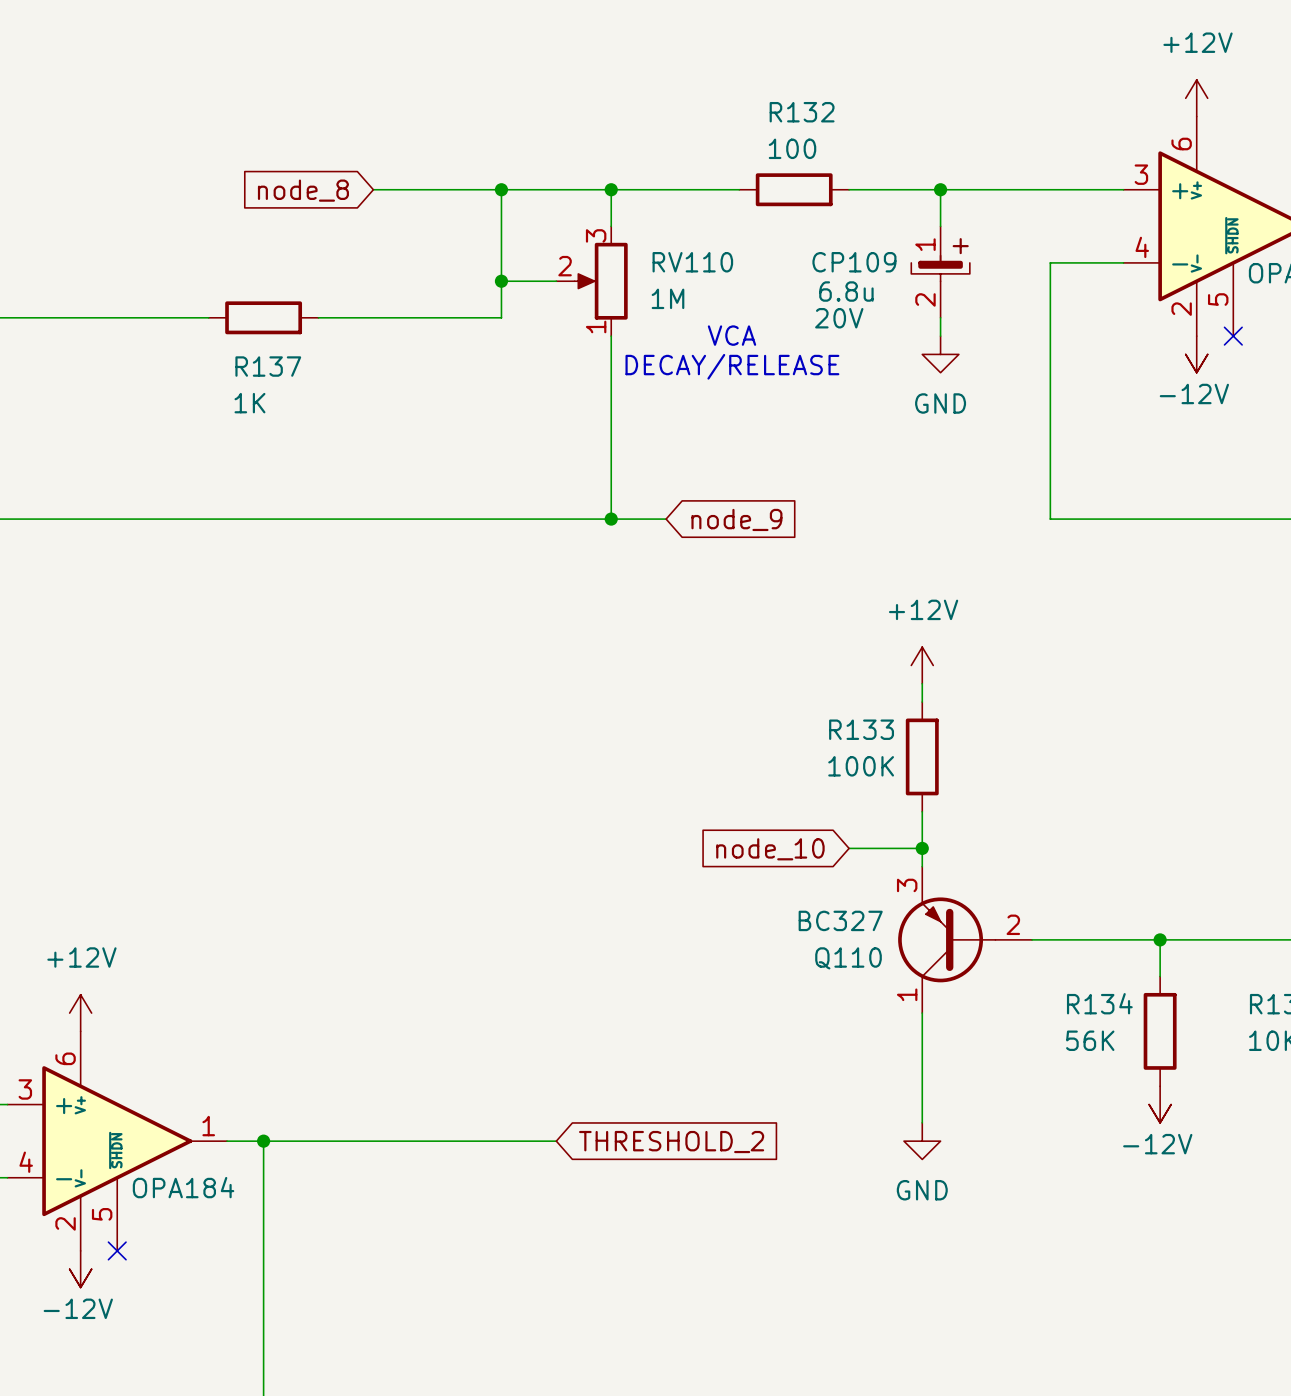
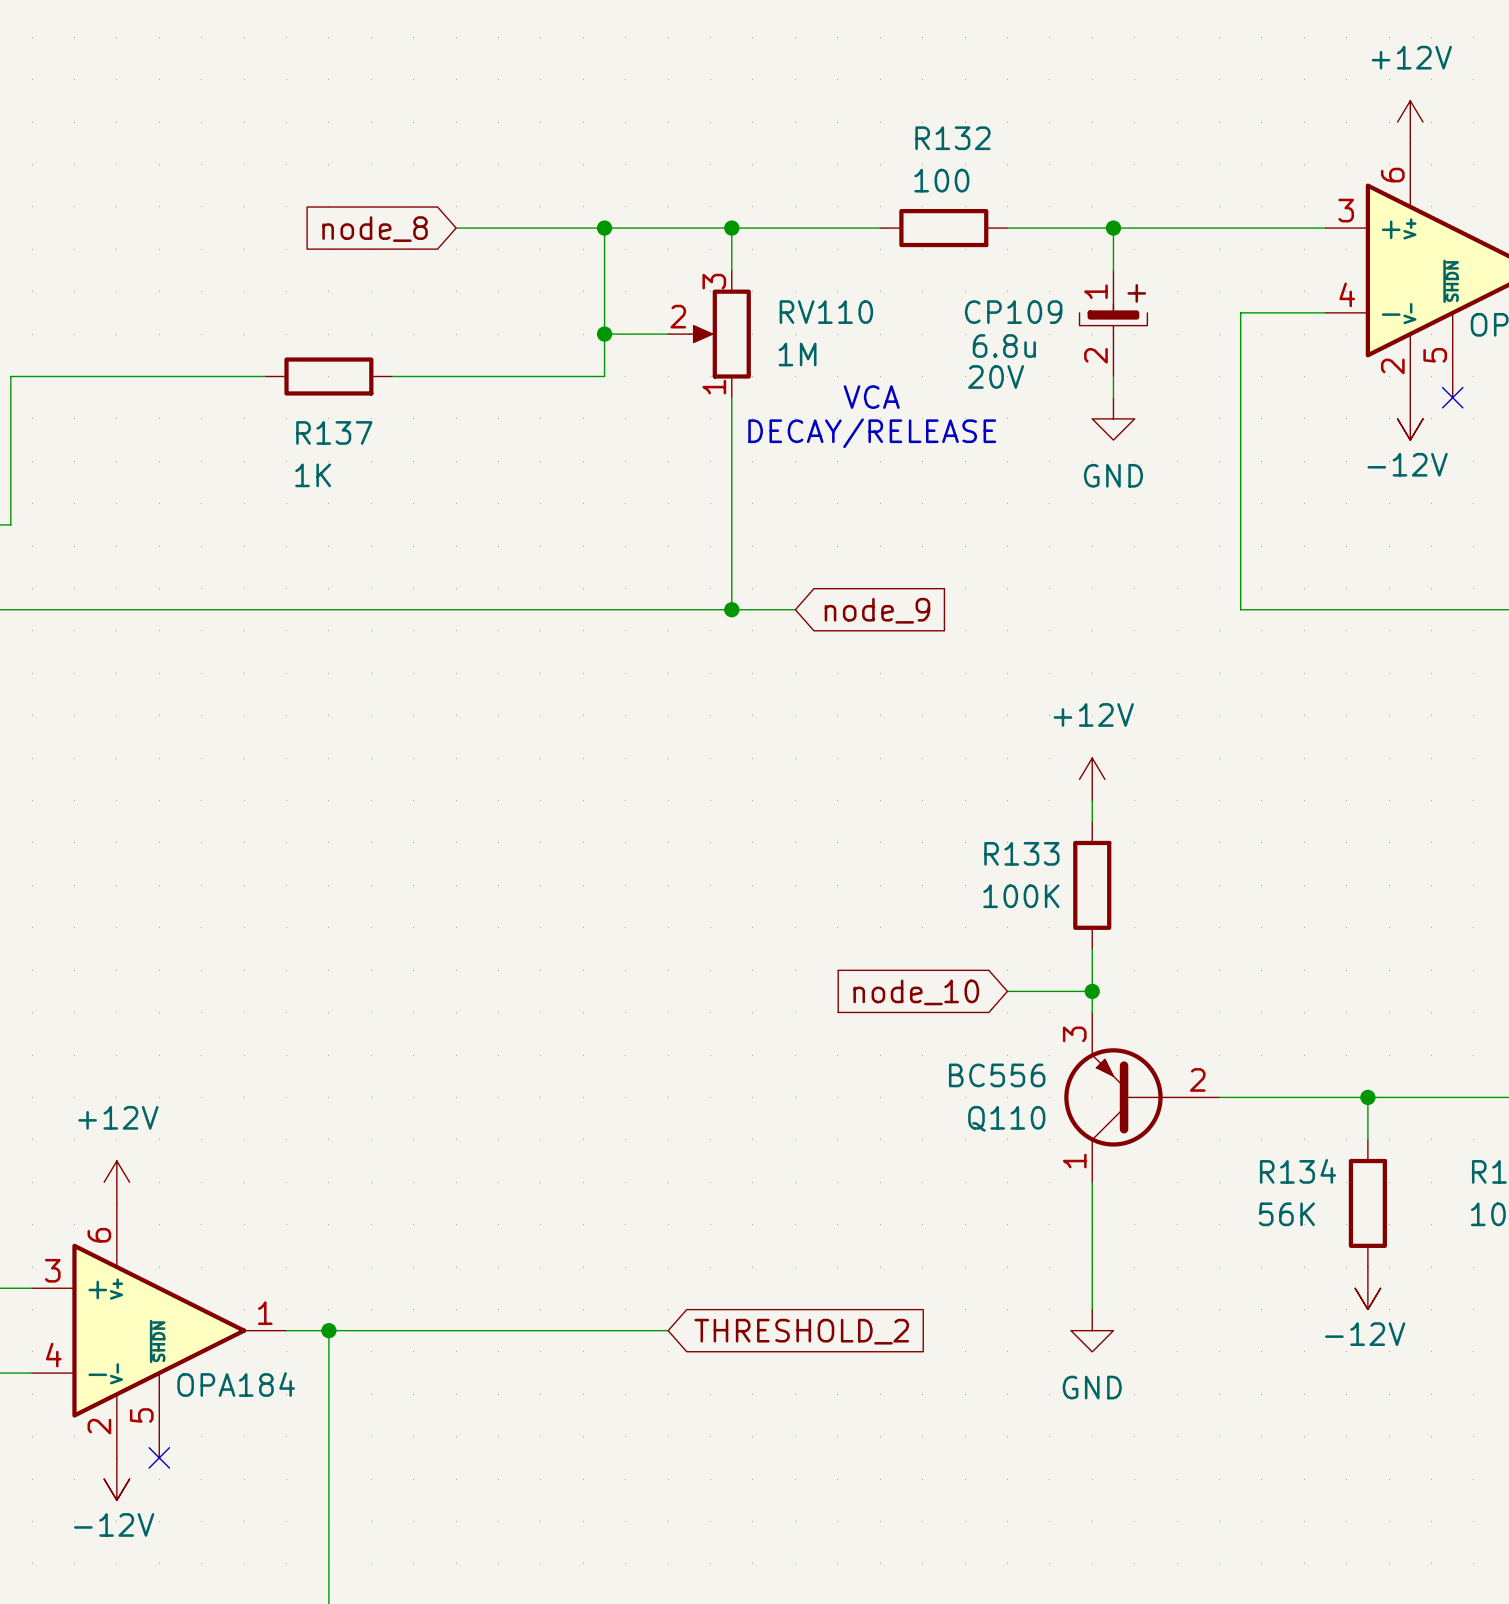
Q110 value: BC327 (840, 920) -> BC556 (997, 1075)

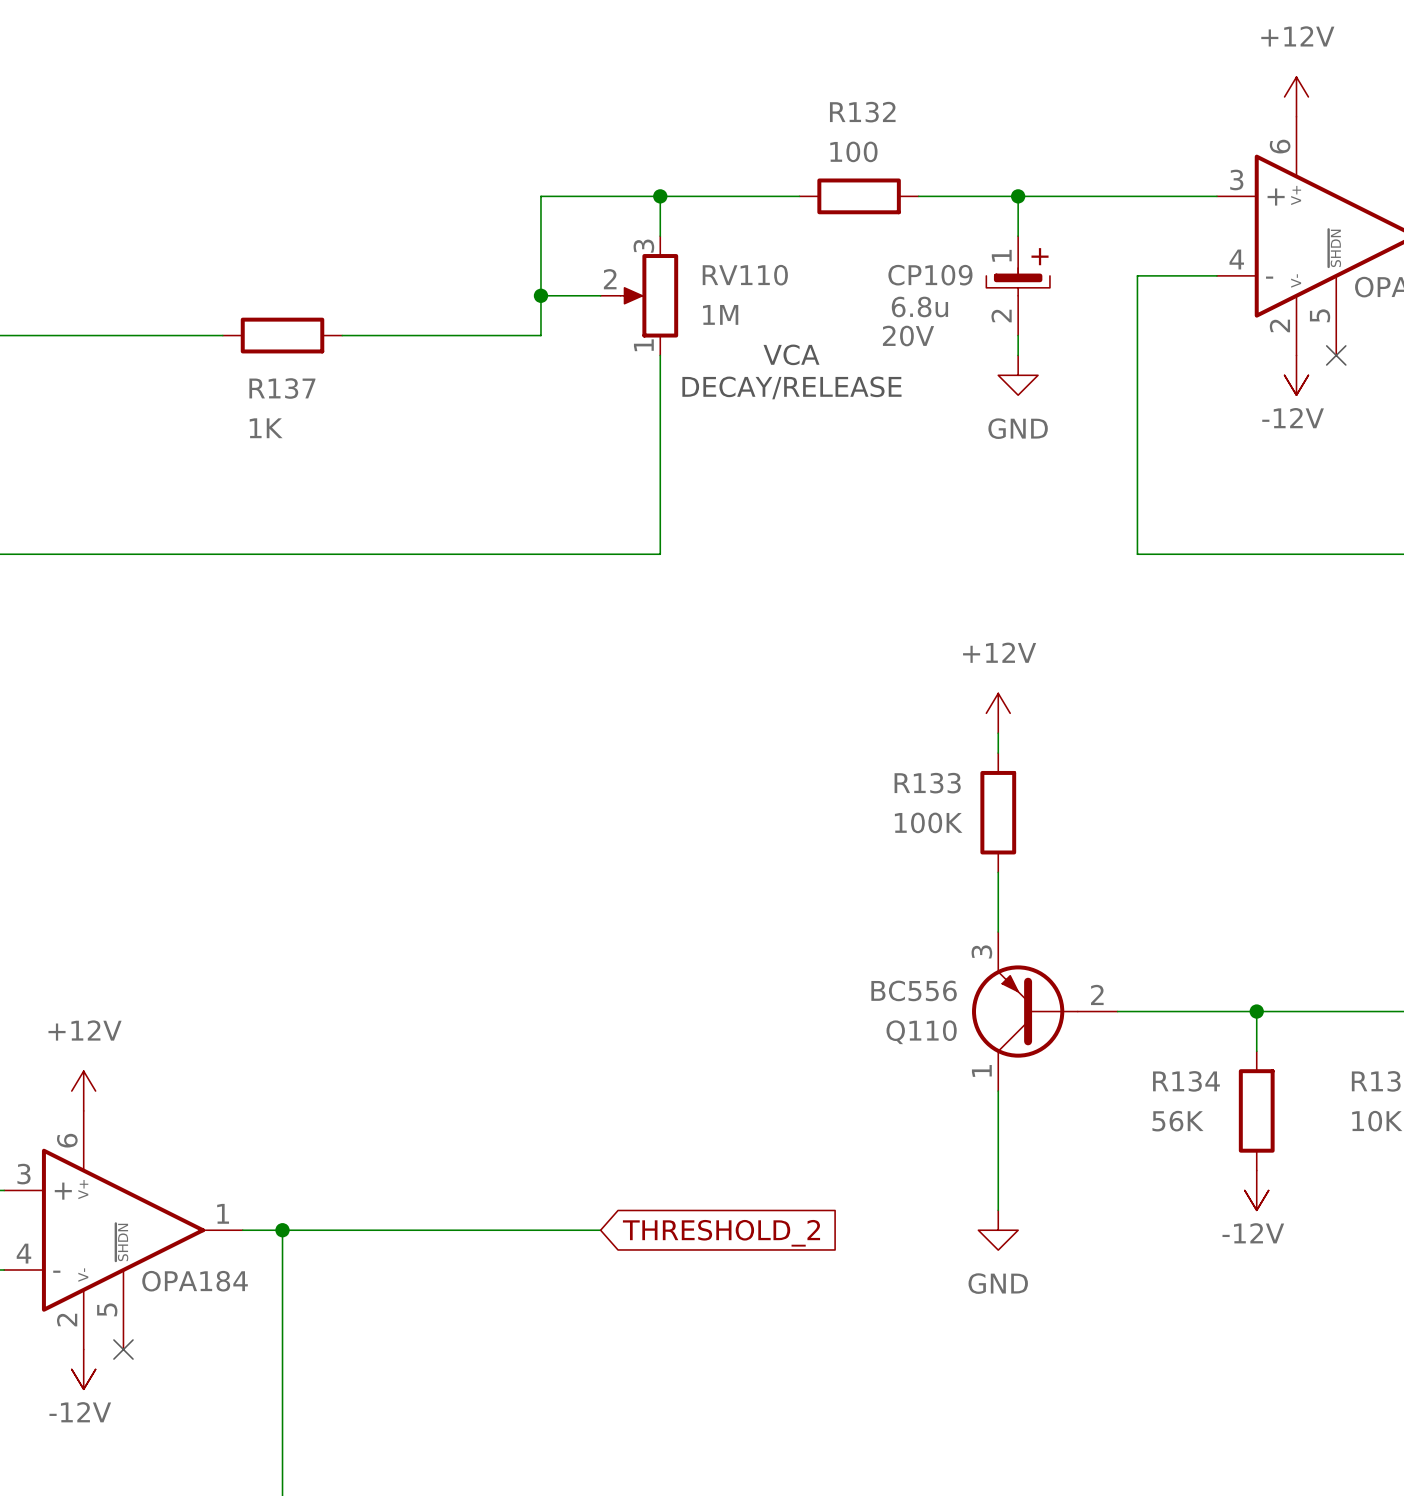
wire: (456, 228) (604, 228) -> none
junction: (604, 228) -> none
global label: node_8 (375, 229) -> none
wire: (731, 609) (795, 609) -> none
junction: (731, 609) -> none
global label: node_9 (877, 610) -> none
wire: (1007, 991) (1092, 991) -> none
junction: (1092, 991) -> none
global label: node_10 (916, 992) -> none

